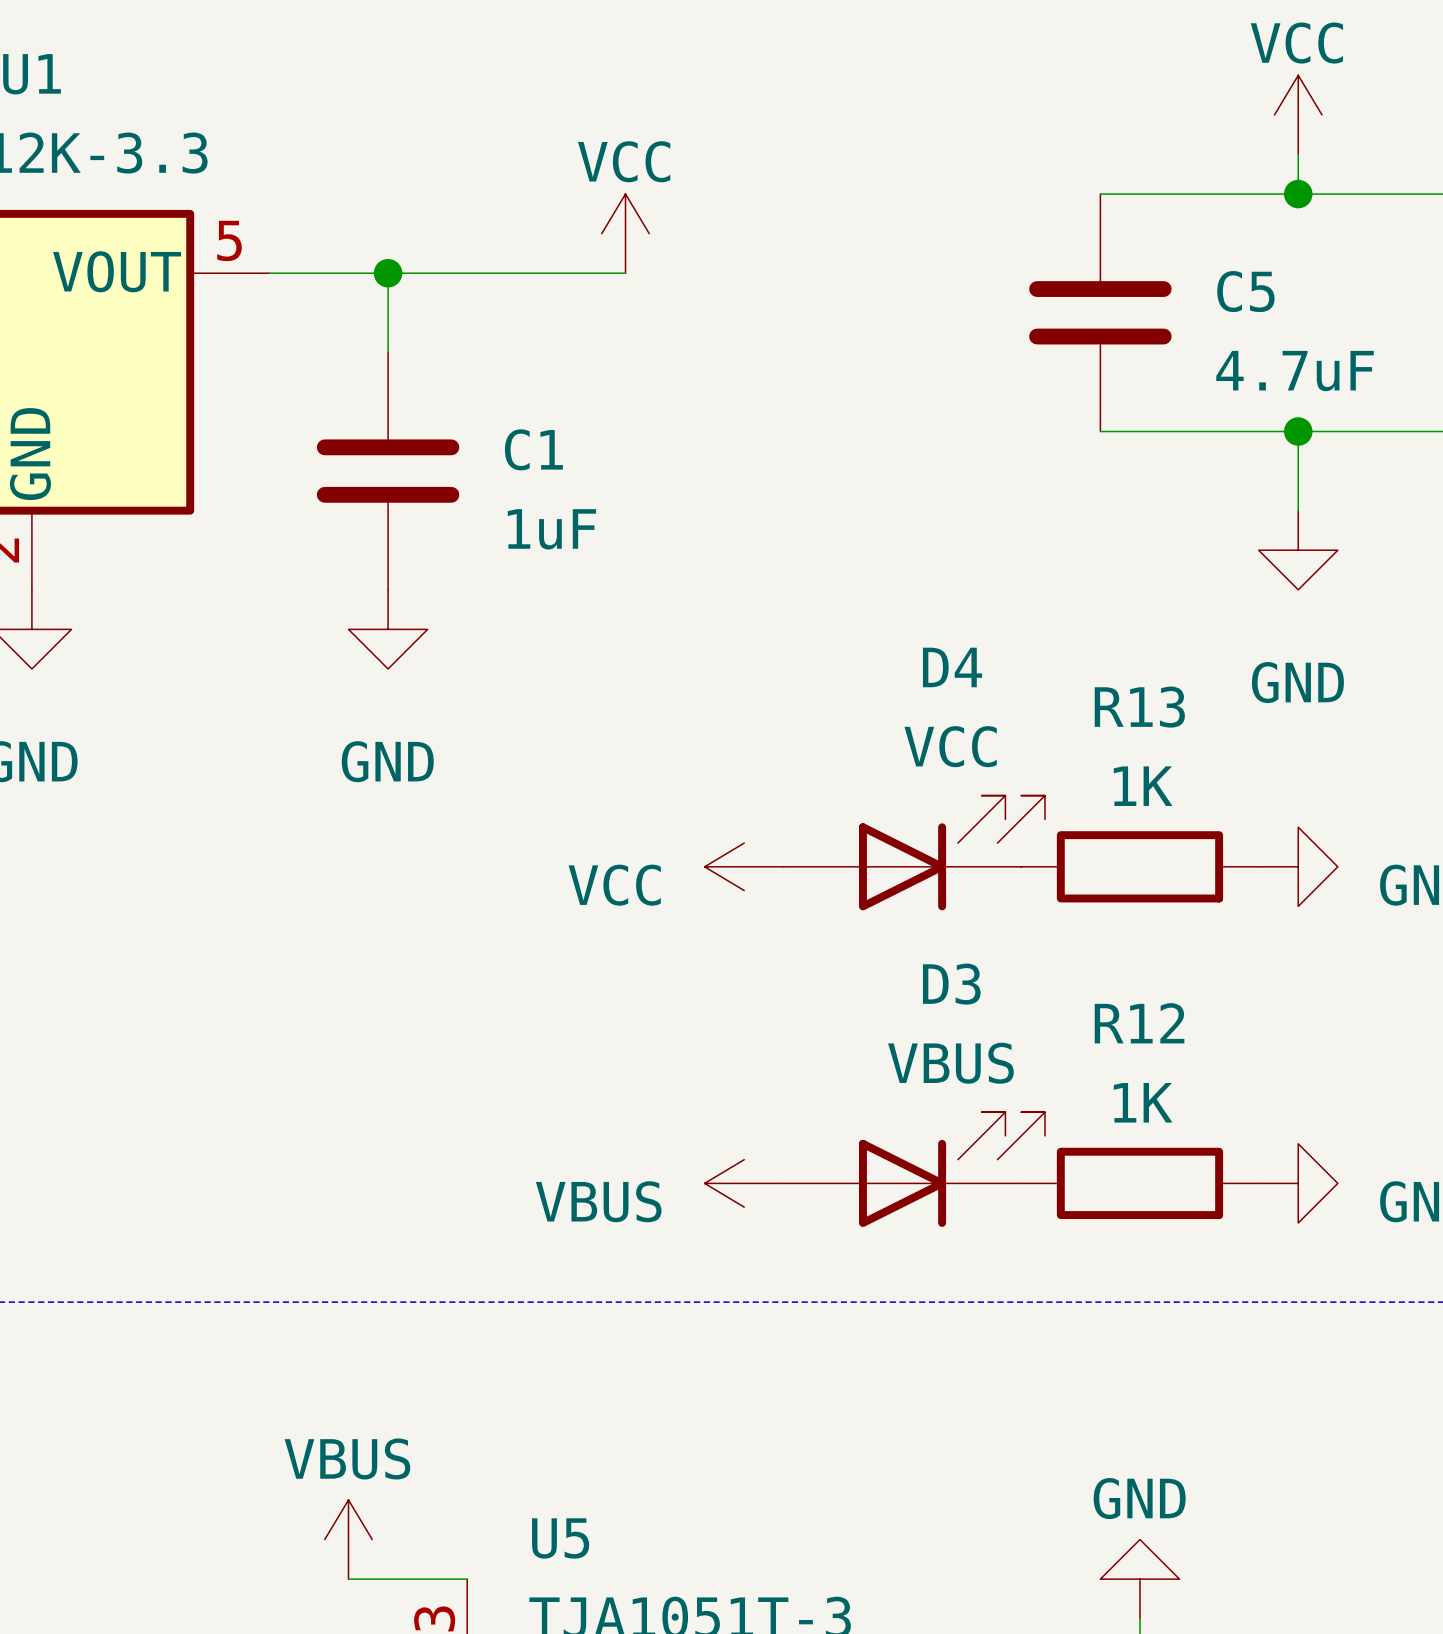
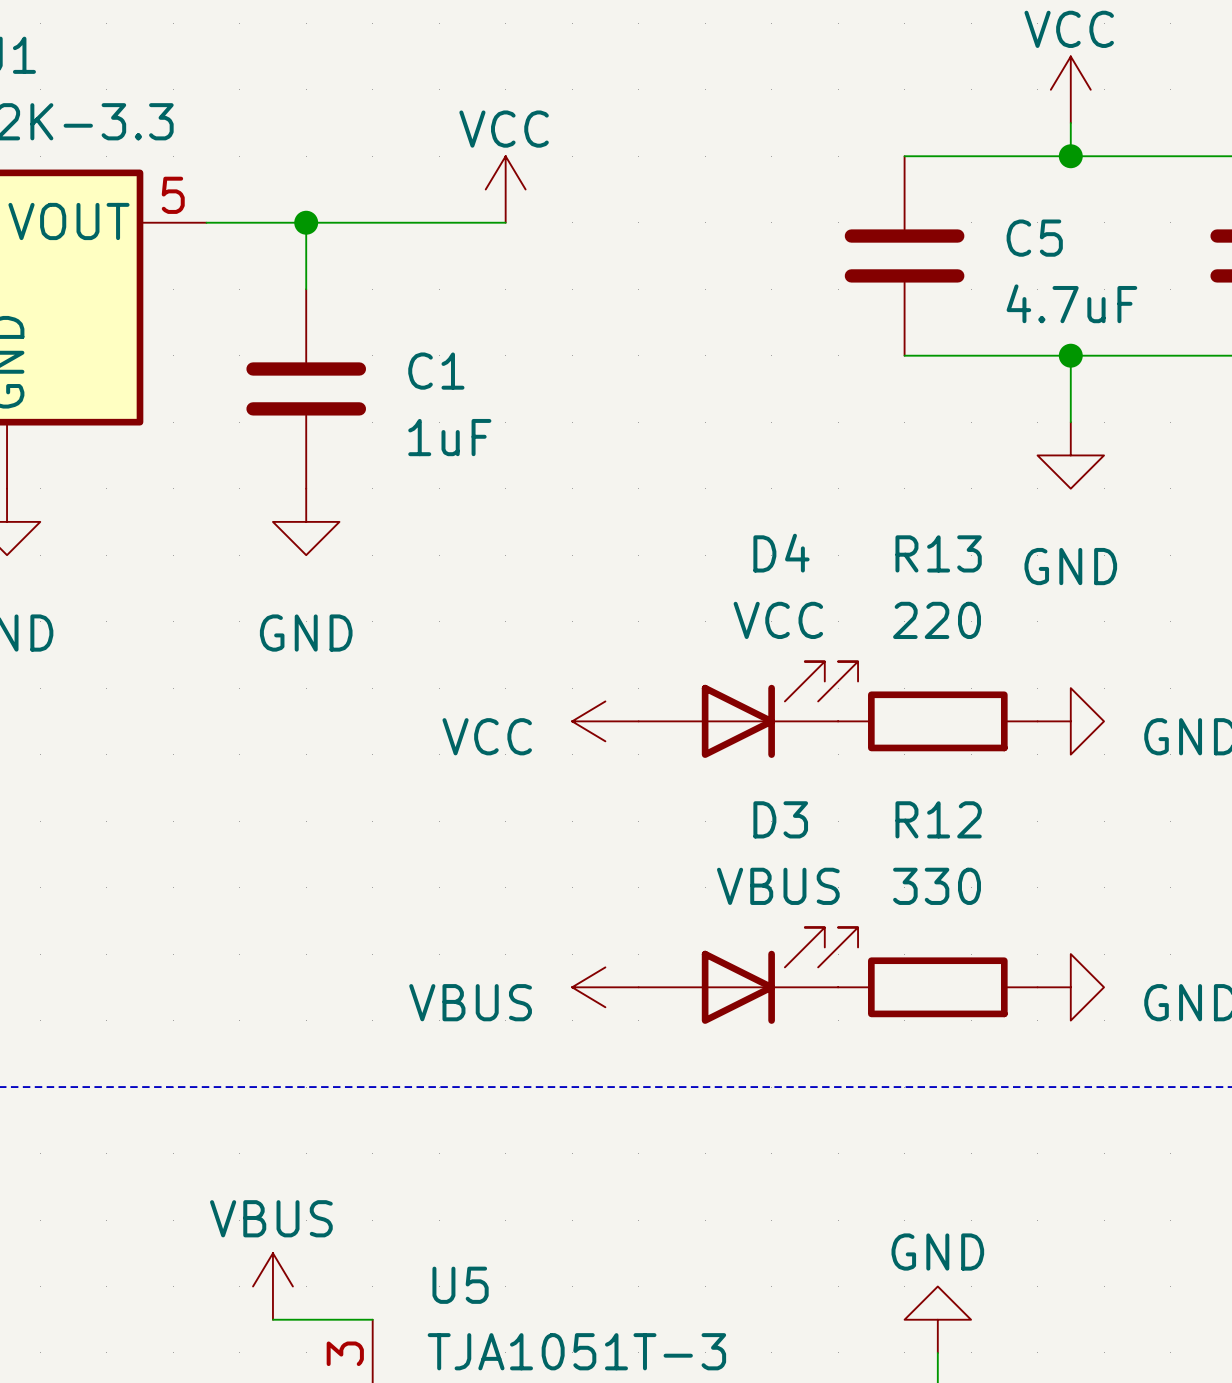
R13 name position: R13 (1139, 707) -> R13 (938, 553)
R13 value: 1K (1143, 786) -> 220 (937, 620)
R12 name position: R12 (1139, 1023) -> R12 (938, 819)
R12 value: 1K (1143, 1102) -> 330 (937, 886)

